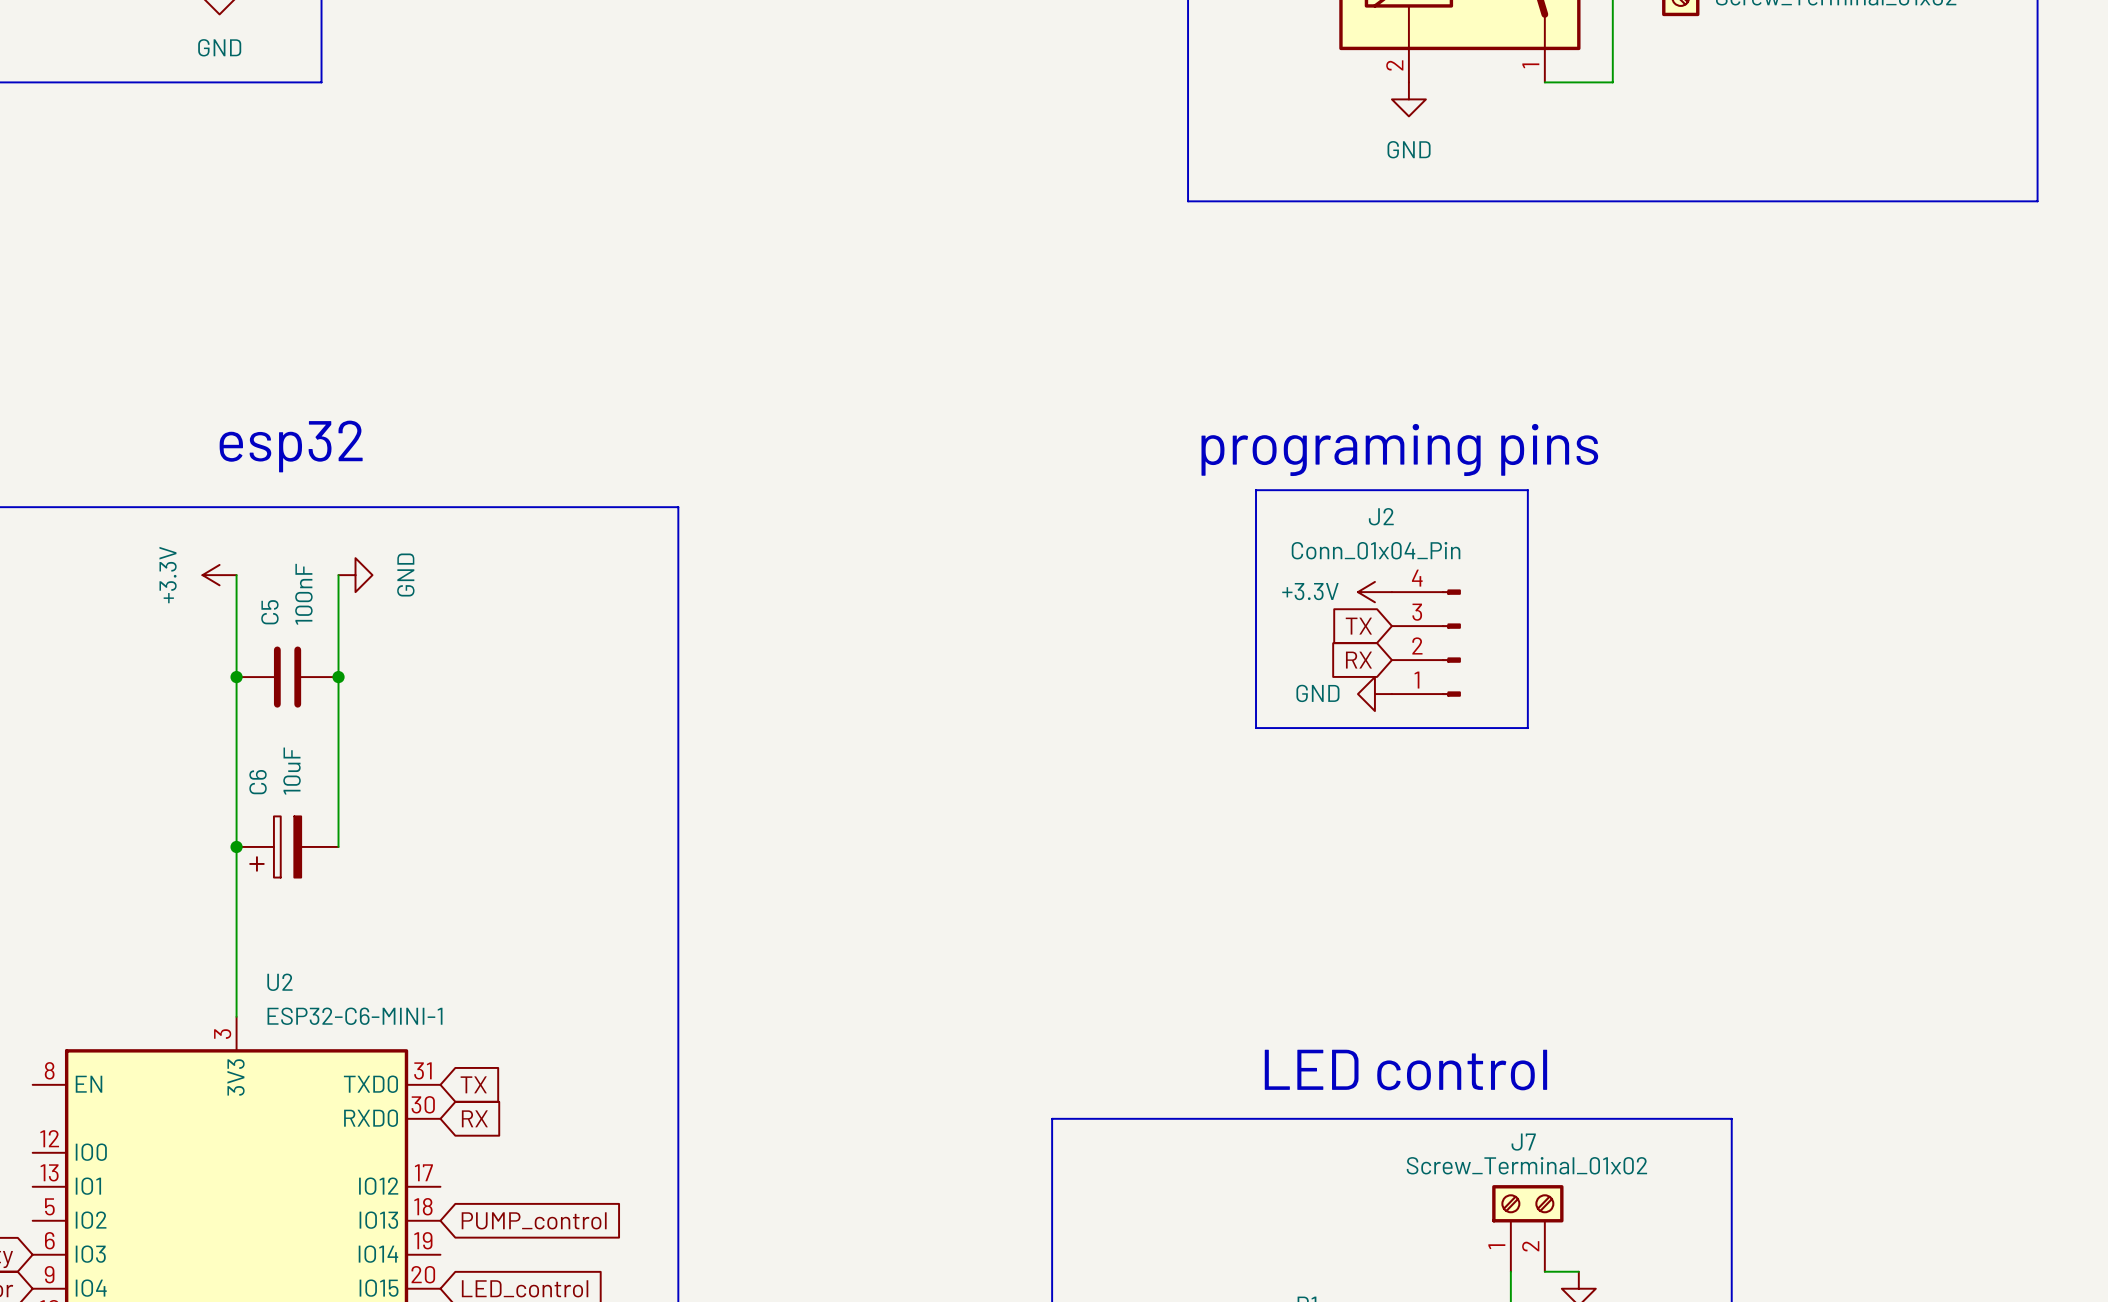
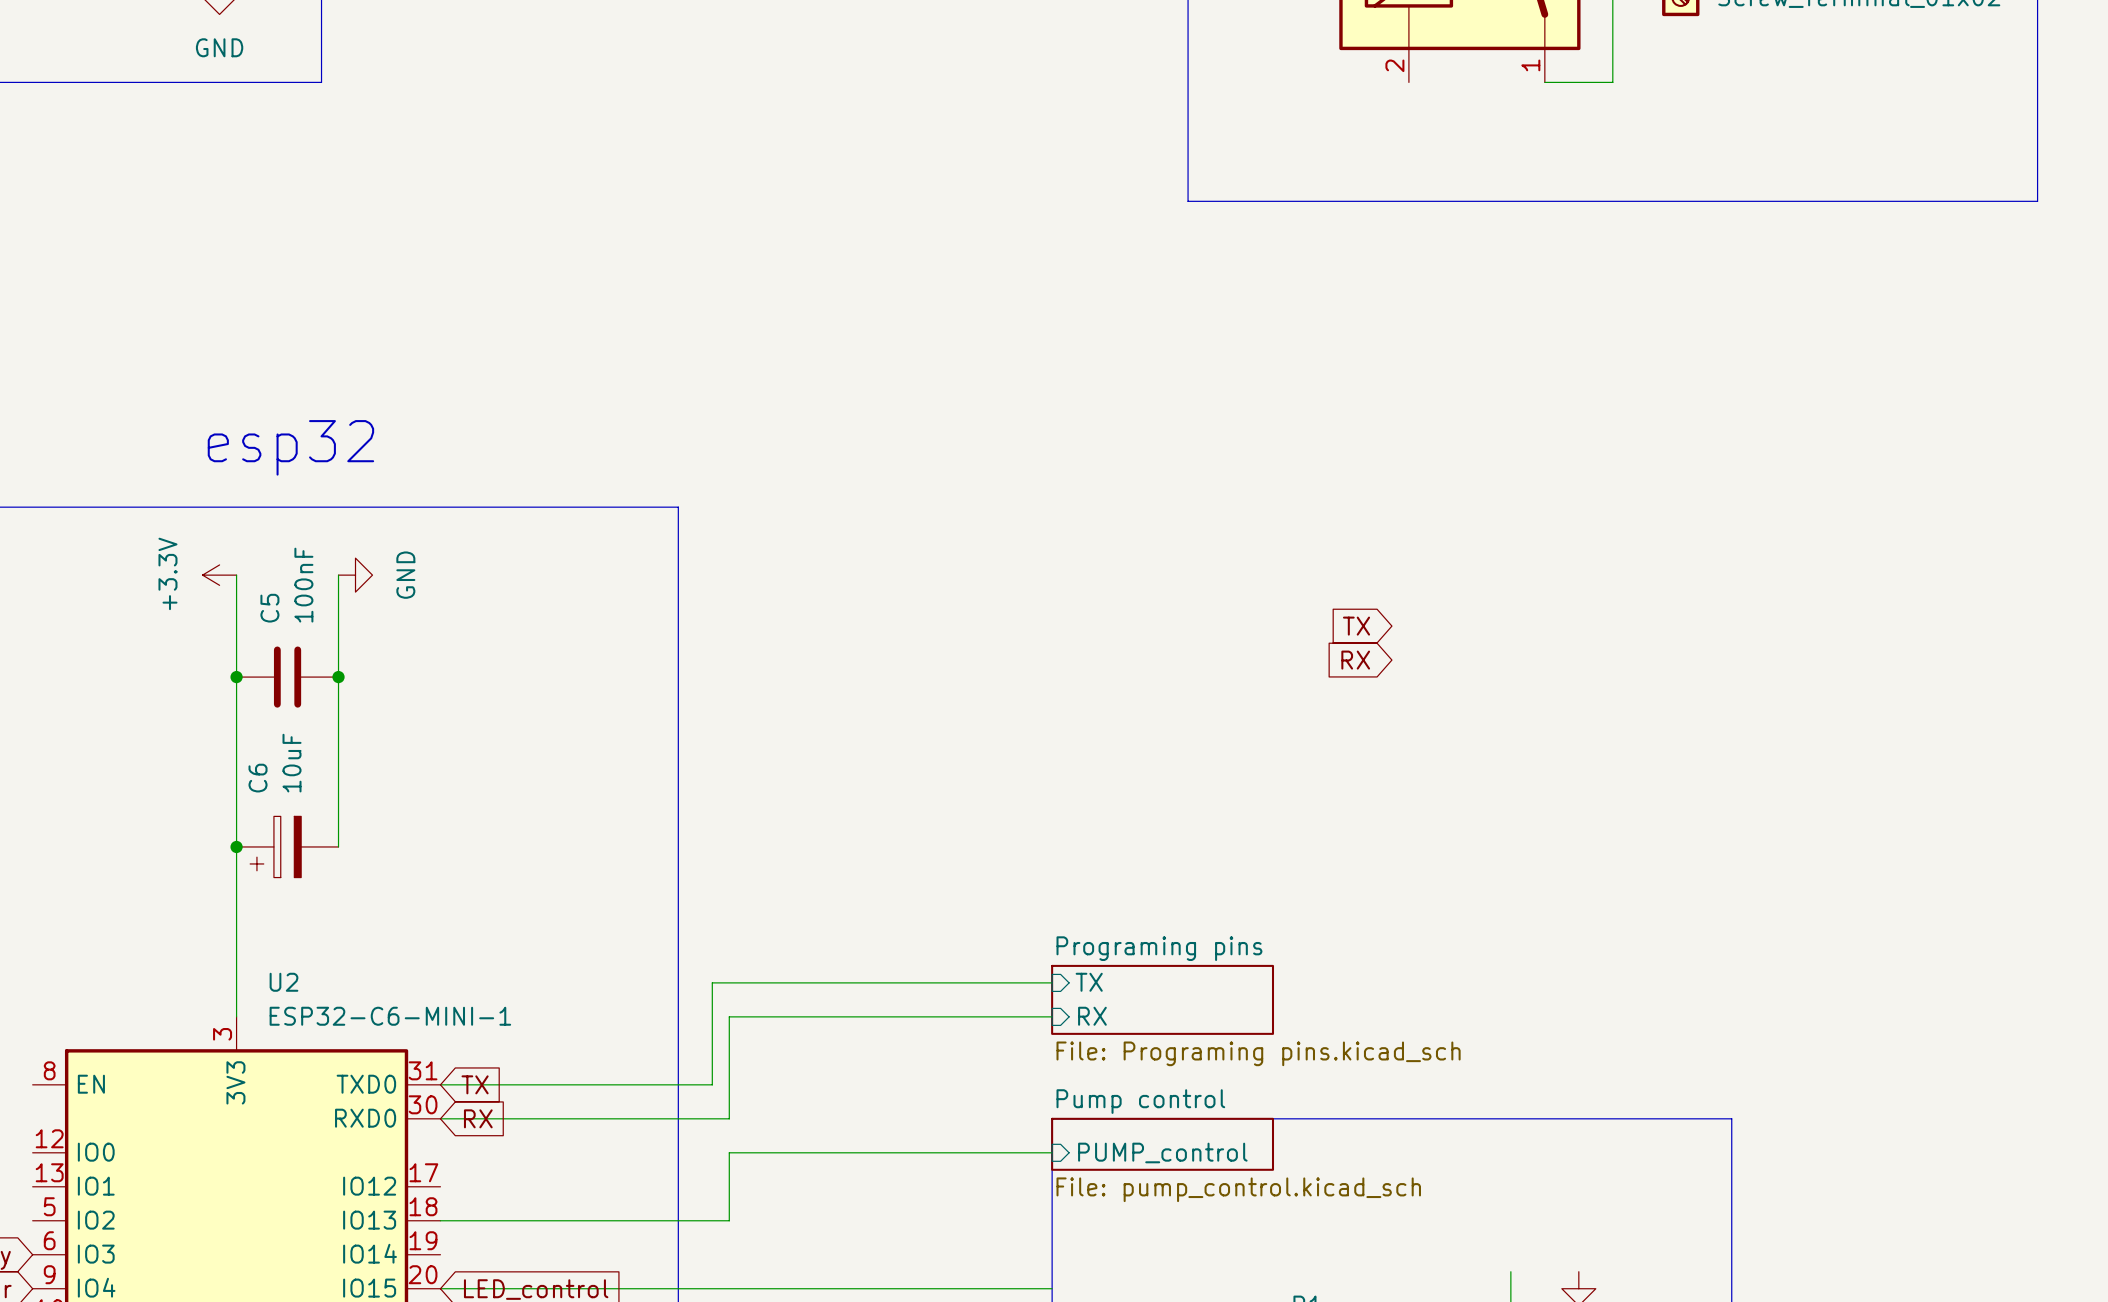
power symbol: GND (1408, 99) -> none
text: programing pins (1399, 449) -> none
line: (1256, 490) (1527, 490) (1527, 728) (1256, 728) (1256, 490) -> none
power symbol: +3.3V (1374, 592) -> none
J2: Conn_01x04_Pin (1426, 643) -> none
power symbol: GND (1374, 694) -> none
wire: none -> (1052, 982) (712, 982) (712, 1084) (440, 1084)
sheet pin: none -> TX (1089, 982)
sheet Programing pins: none -> File: Programing pins.kicad_sch (1162, 999)
wire: none -> (1052, 1016) (729, 1016) (729, 1118) (440, 1118)
sheet pin: none -> RX (1092, 1016)
text: LED control (1405, 1070) -> none
sheet Pump control: none -> File: pump_control.kicad_sch (1162, 1144)
wire: none -> (1052, 1152) (729, 1152) (729, 1220) (440, 1220)
sheet pin: none -> PUMP_control (1162, 1152)
global label: PUMP_control (534, 1220) -> none
J7: Screw_Terminal_01x02 (1527, 1228) -> none
wire: (1544, 1271) (1578, 1271) -> none
wire: none -> (440, 1288) (1052, 1288)

